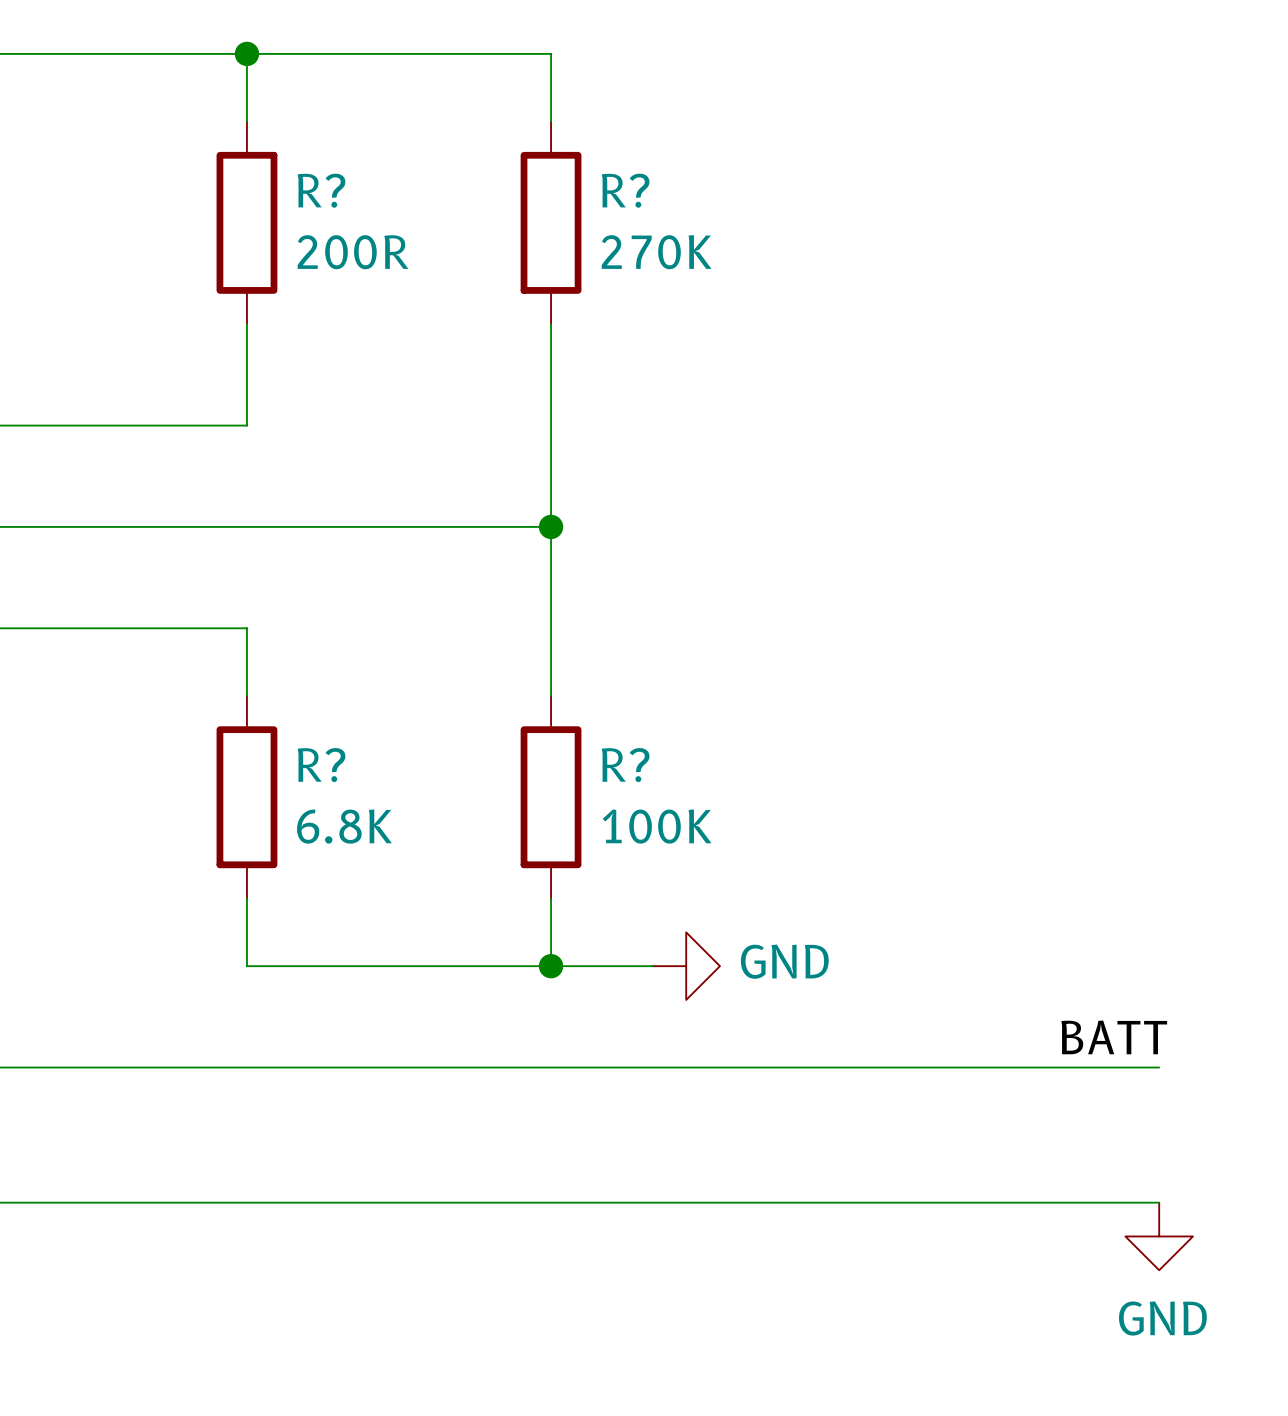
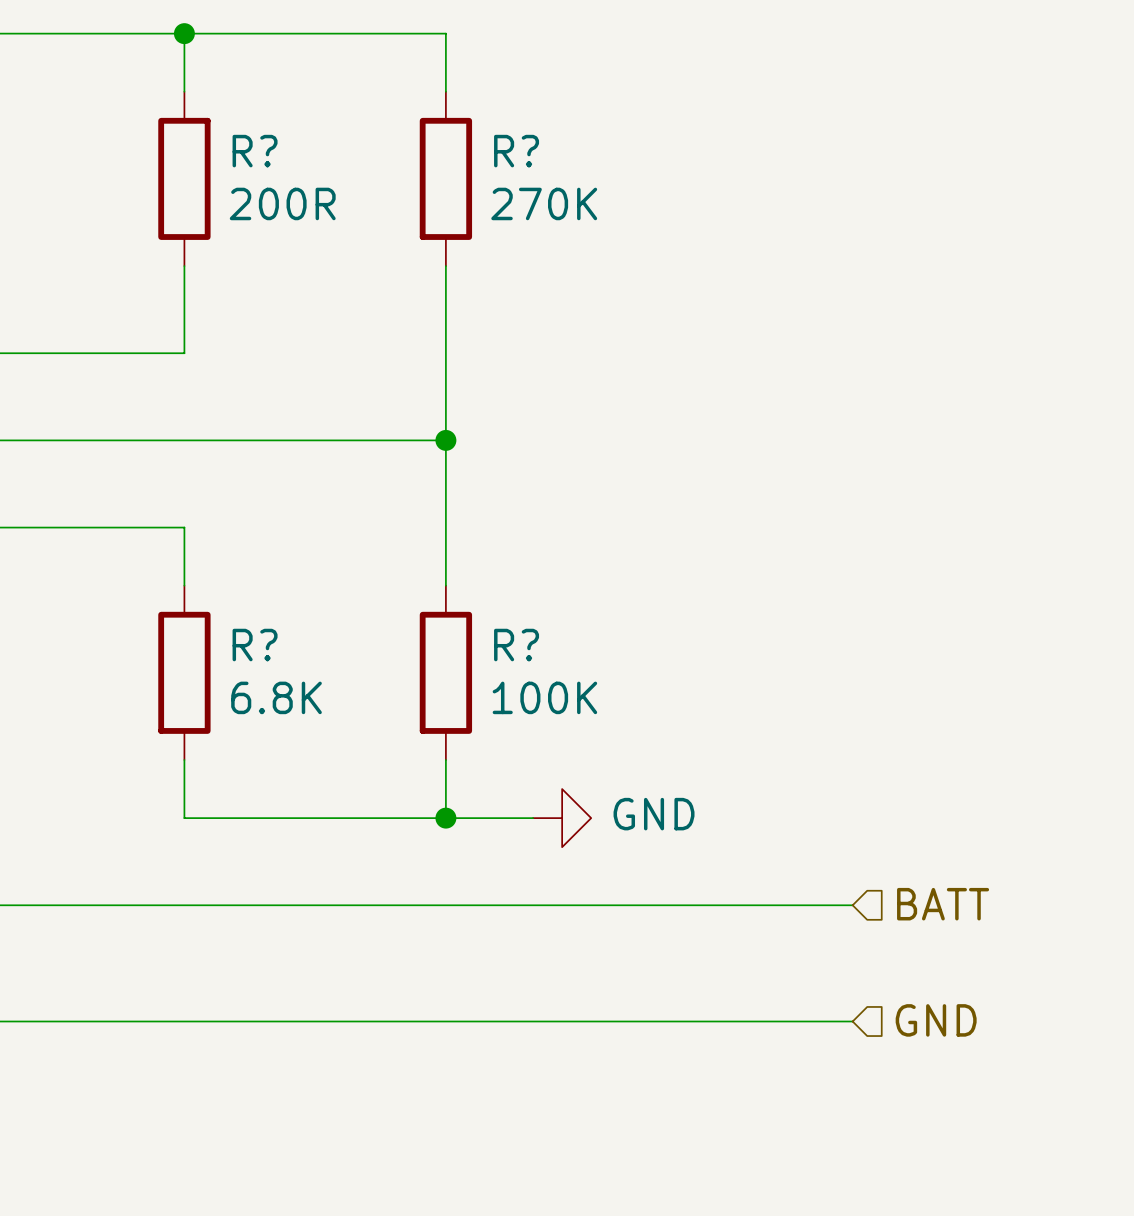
label: BATT (1114, 1037) -> none
hierarchical label: none -> BATT (943, 904)
wire: (1024, 1067) (1159, 1067) -> none
hierarchical label: none -> GND (936, 1020)
wire: (1024, 1202) (1159, 1202) -> none
power symbol: GND (1159, 1236) -> none

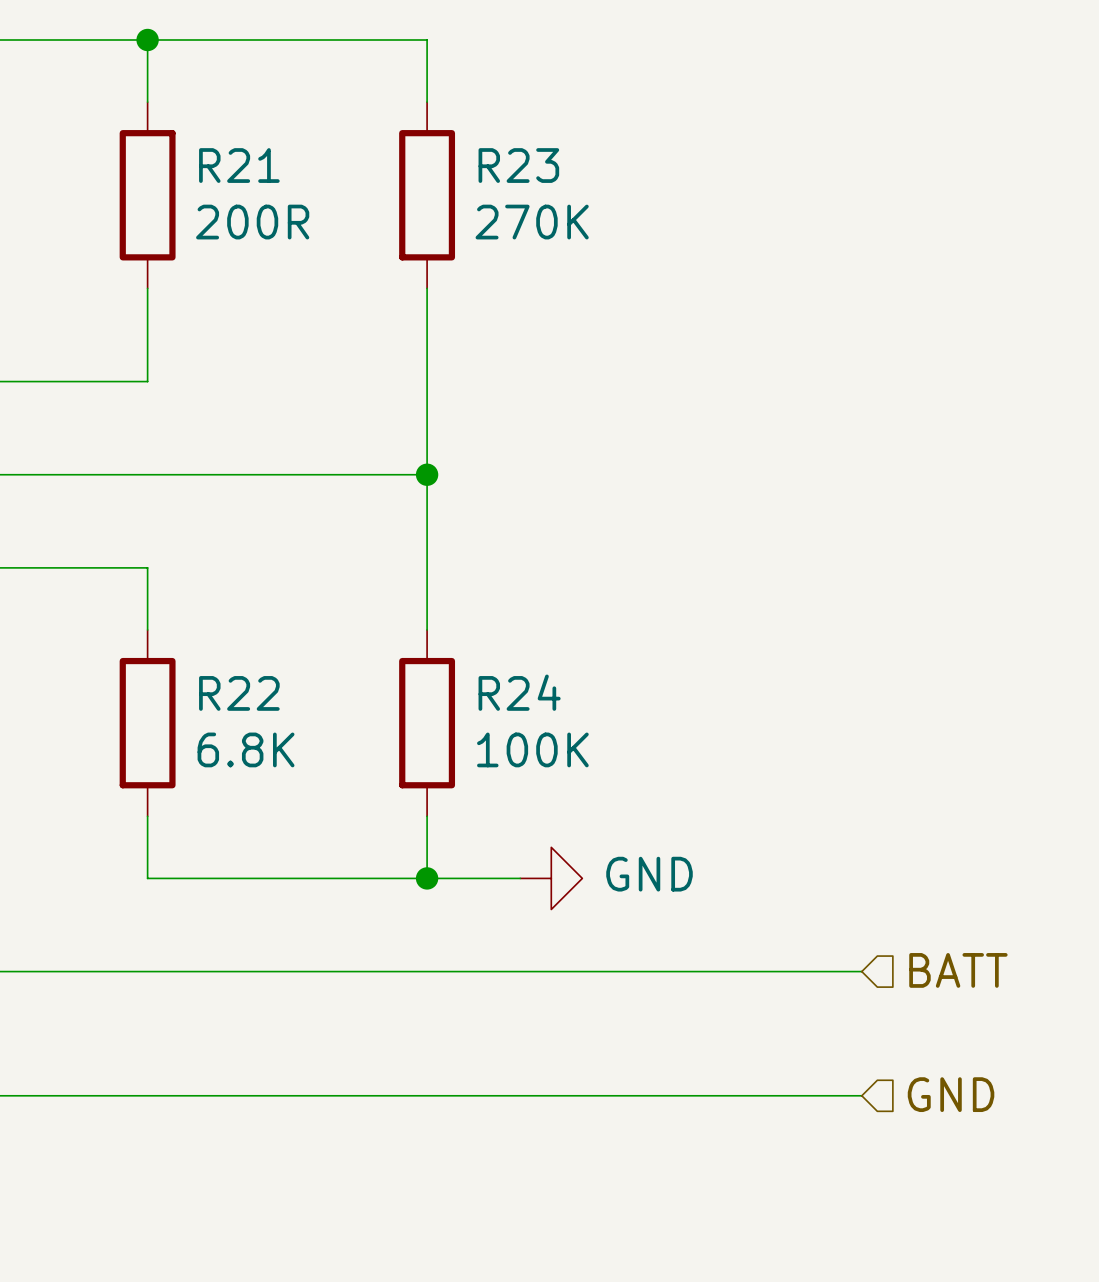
R? name: R? (255, 151) -> R21 (239, 165)
R? name: R? (516, 151) -> R23 (518, 165)
R? name: R? (255, 645) -> R22 (239, 693)
R? name: R? (516, 645) -> R24 (519, 692)

